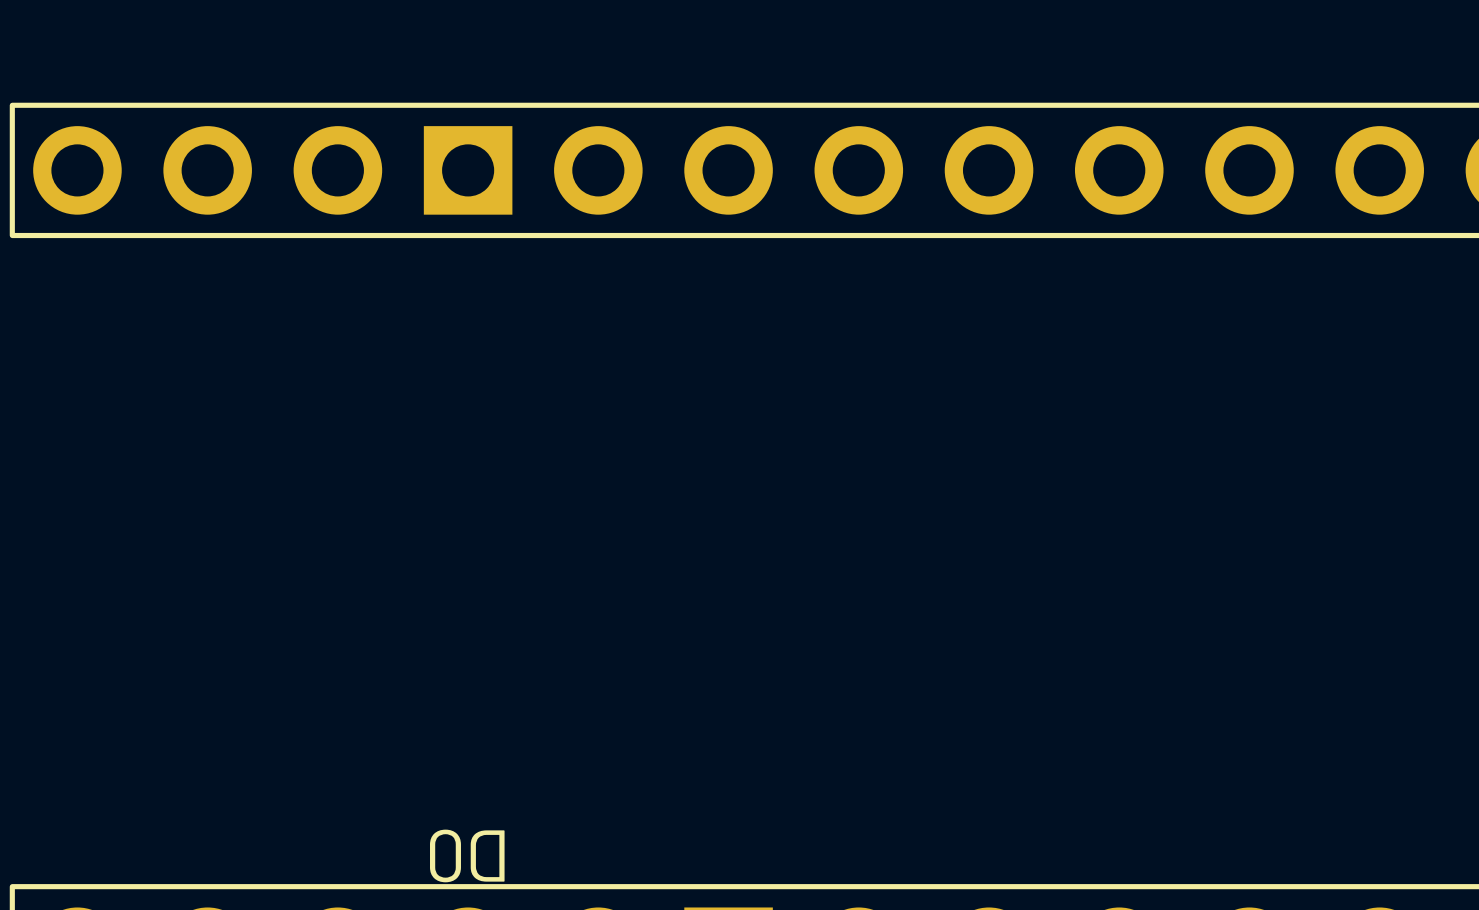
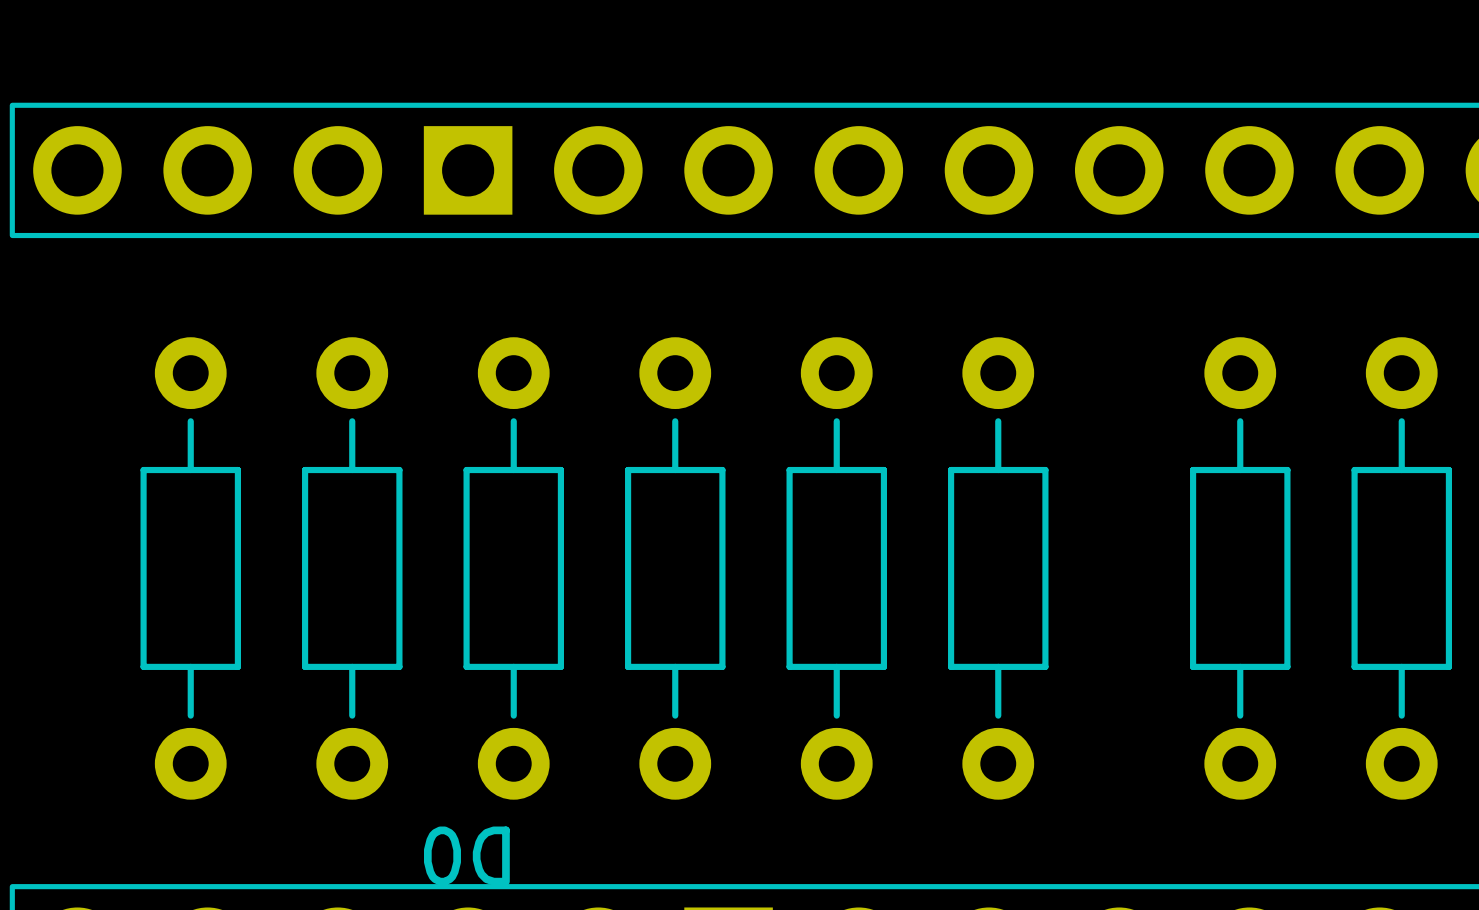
part: none -> (190, 568)
part: none -> (352, 568)
part: none -> (513, 568)
part: none -> (675, 568)
part: none -> (836, 568)
part: none -> (998, 568)
part: none -> (1240, 568)
part: none -> (1401, 568)

